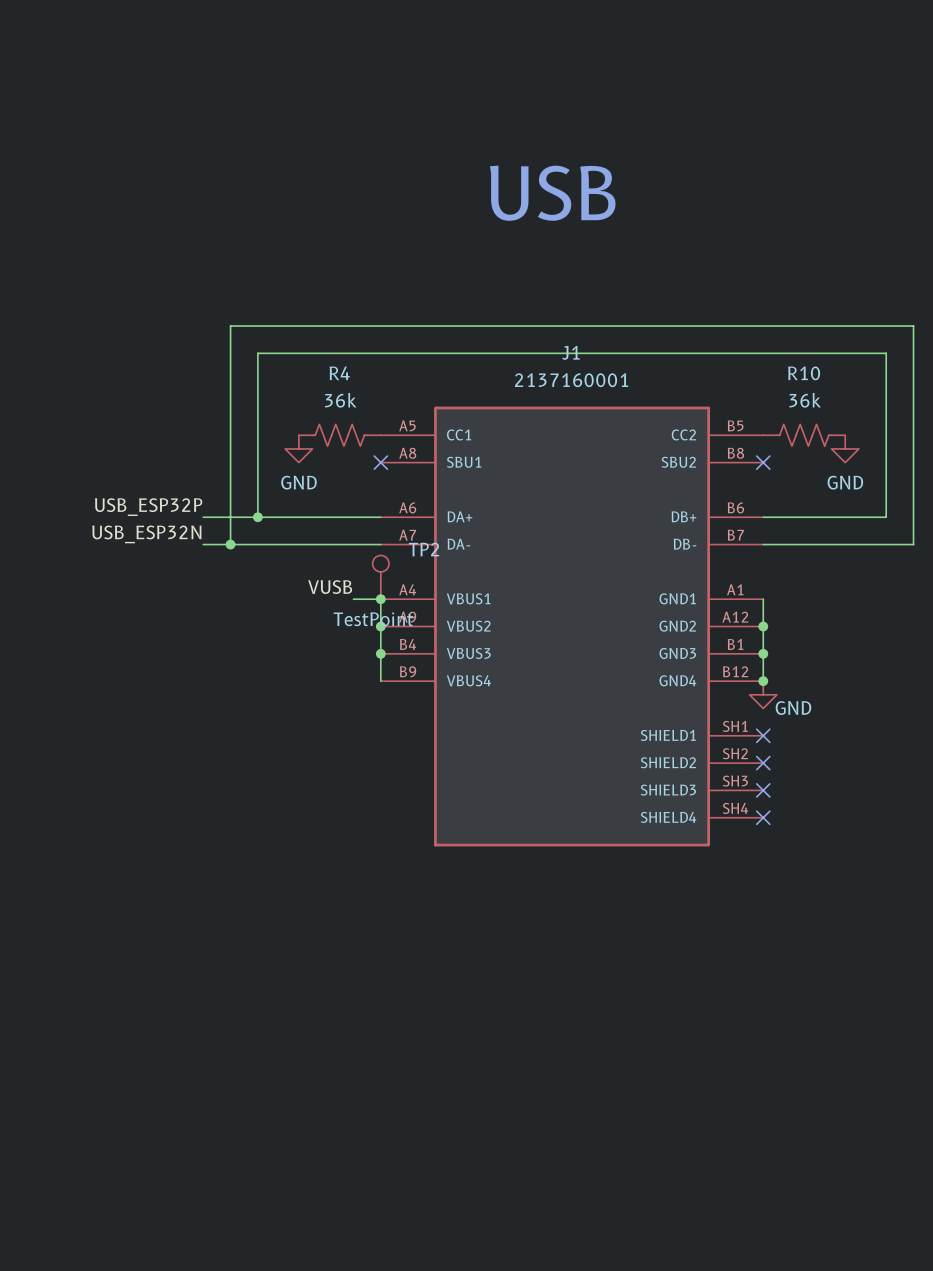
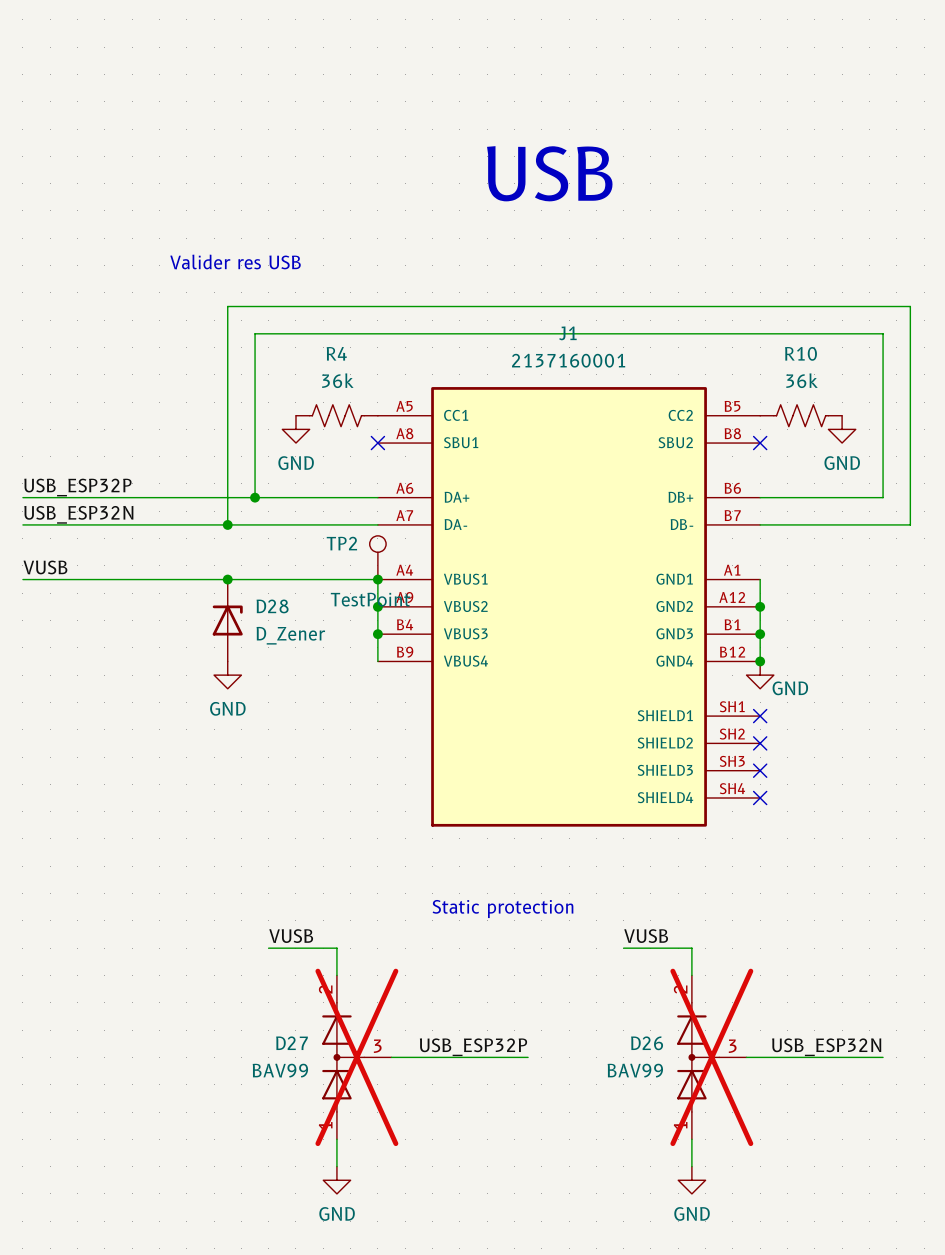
text: none -> Valider res USB (235, 261)
label position: USB_ESP32P (148, 507) -> USB_ESP32P (77, 487)
wire: none -> (22, 497) (200, 497)
label position: USB_ESP32N (146, 534) -> USB_ESP32N (78, 514)
wire: none -> (22, 524) (200, 524)
TP2 name position: TP2 (424, 549) -> TP2 (341, 543)
label: none -> VUSB (45, 567)
label: VUSB (330, 587) -> none
wire: none -> (22, 579) (350, 579)
junction: none -> (227, 579)
D28: none -> D_Zener (227, 620)
power symbol: none -> GND (227, 675)
text: none -> Static protection (502, 909)
label: none -> VUSB (291, 936)
label: none -> VUSB (646, 936)
wire: none -> (268, 948) (336, 948) (336, 975)
wire: none -> (623, 948) (691, 948) (691, 975)
label: none -> USB_ESP32P (473, 1047)
label: none -> USB_ESP32N (826, 1047)
D27: none -> BAV99 (356, 1057)
wire: none -> (391, 1057) (528, 1057)
D26: none -> BAV99 (711, 1057)
wire: none -> (746, 1057) (883, 1057)
wire: none -> (336, 1139) (336, 1166)
wire: none -> (691, 1139) (691, 1166)
power symbol: none -> GND (336, 1180)
power symbol: none -> GND (691, 1180)

